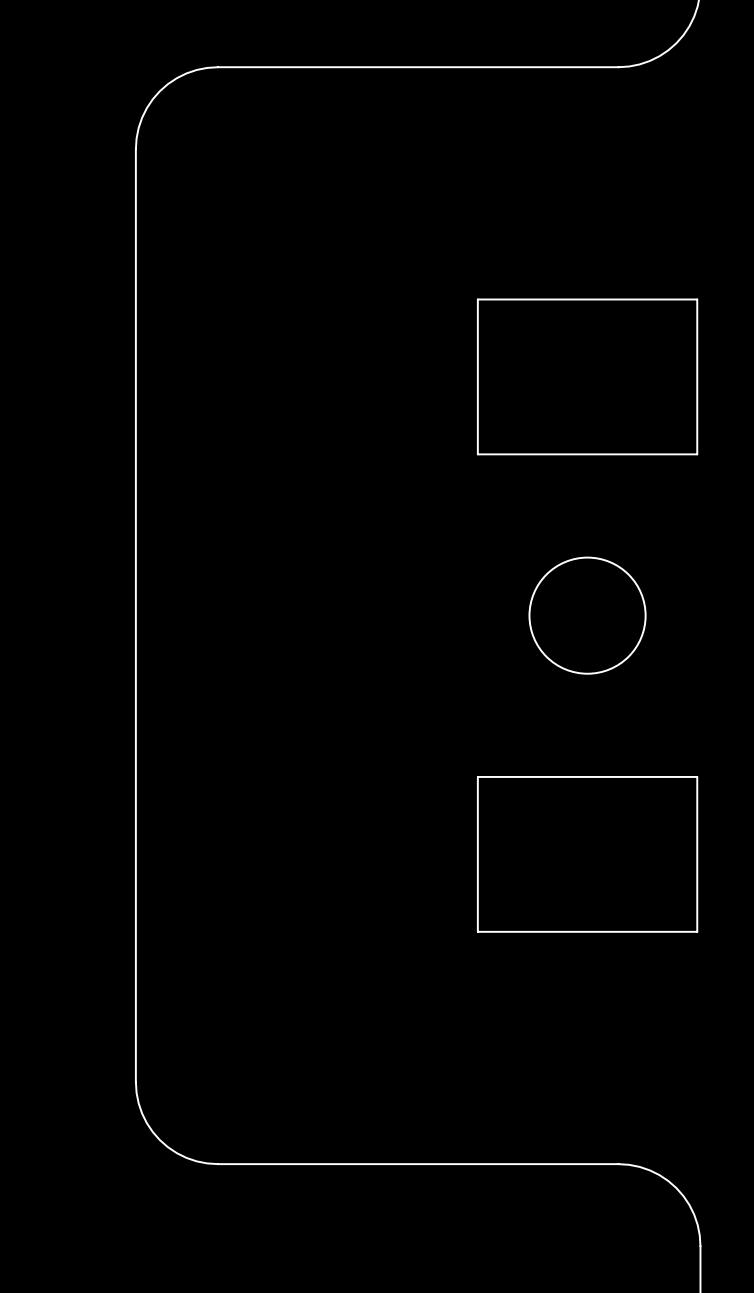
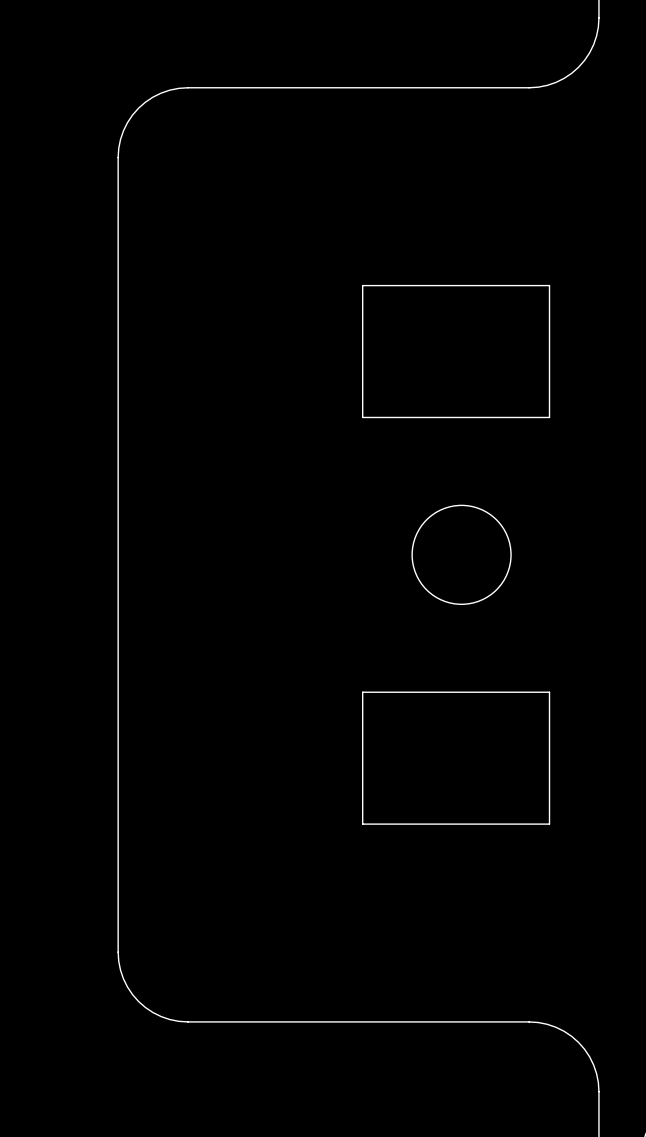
board edge: (477, 299) (477, 454) -> (409, 285) (362, 285) (362, 417) (409, 417)
board edge: (642, 299) (697, 299) (697, 454) (642, 454) -> (549, 285) (549, 417)
round board edge position: (587, 615) -> (461, 554)
board edge: (477, 776) (477, 931) -> (409, 692) (362, 692) (362, 824) (409, 824)
board edge: (642, 776) (697, 776) (697, 931) (642, 931) -> (549, 692) (549, 824)

